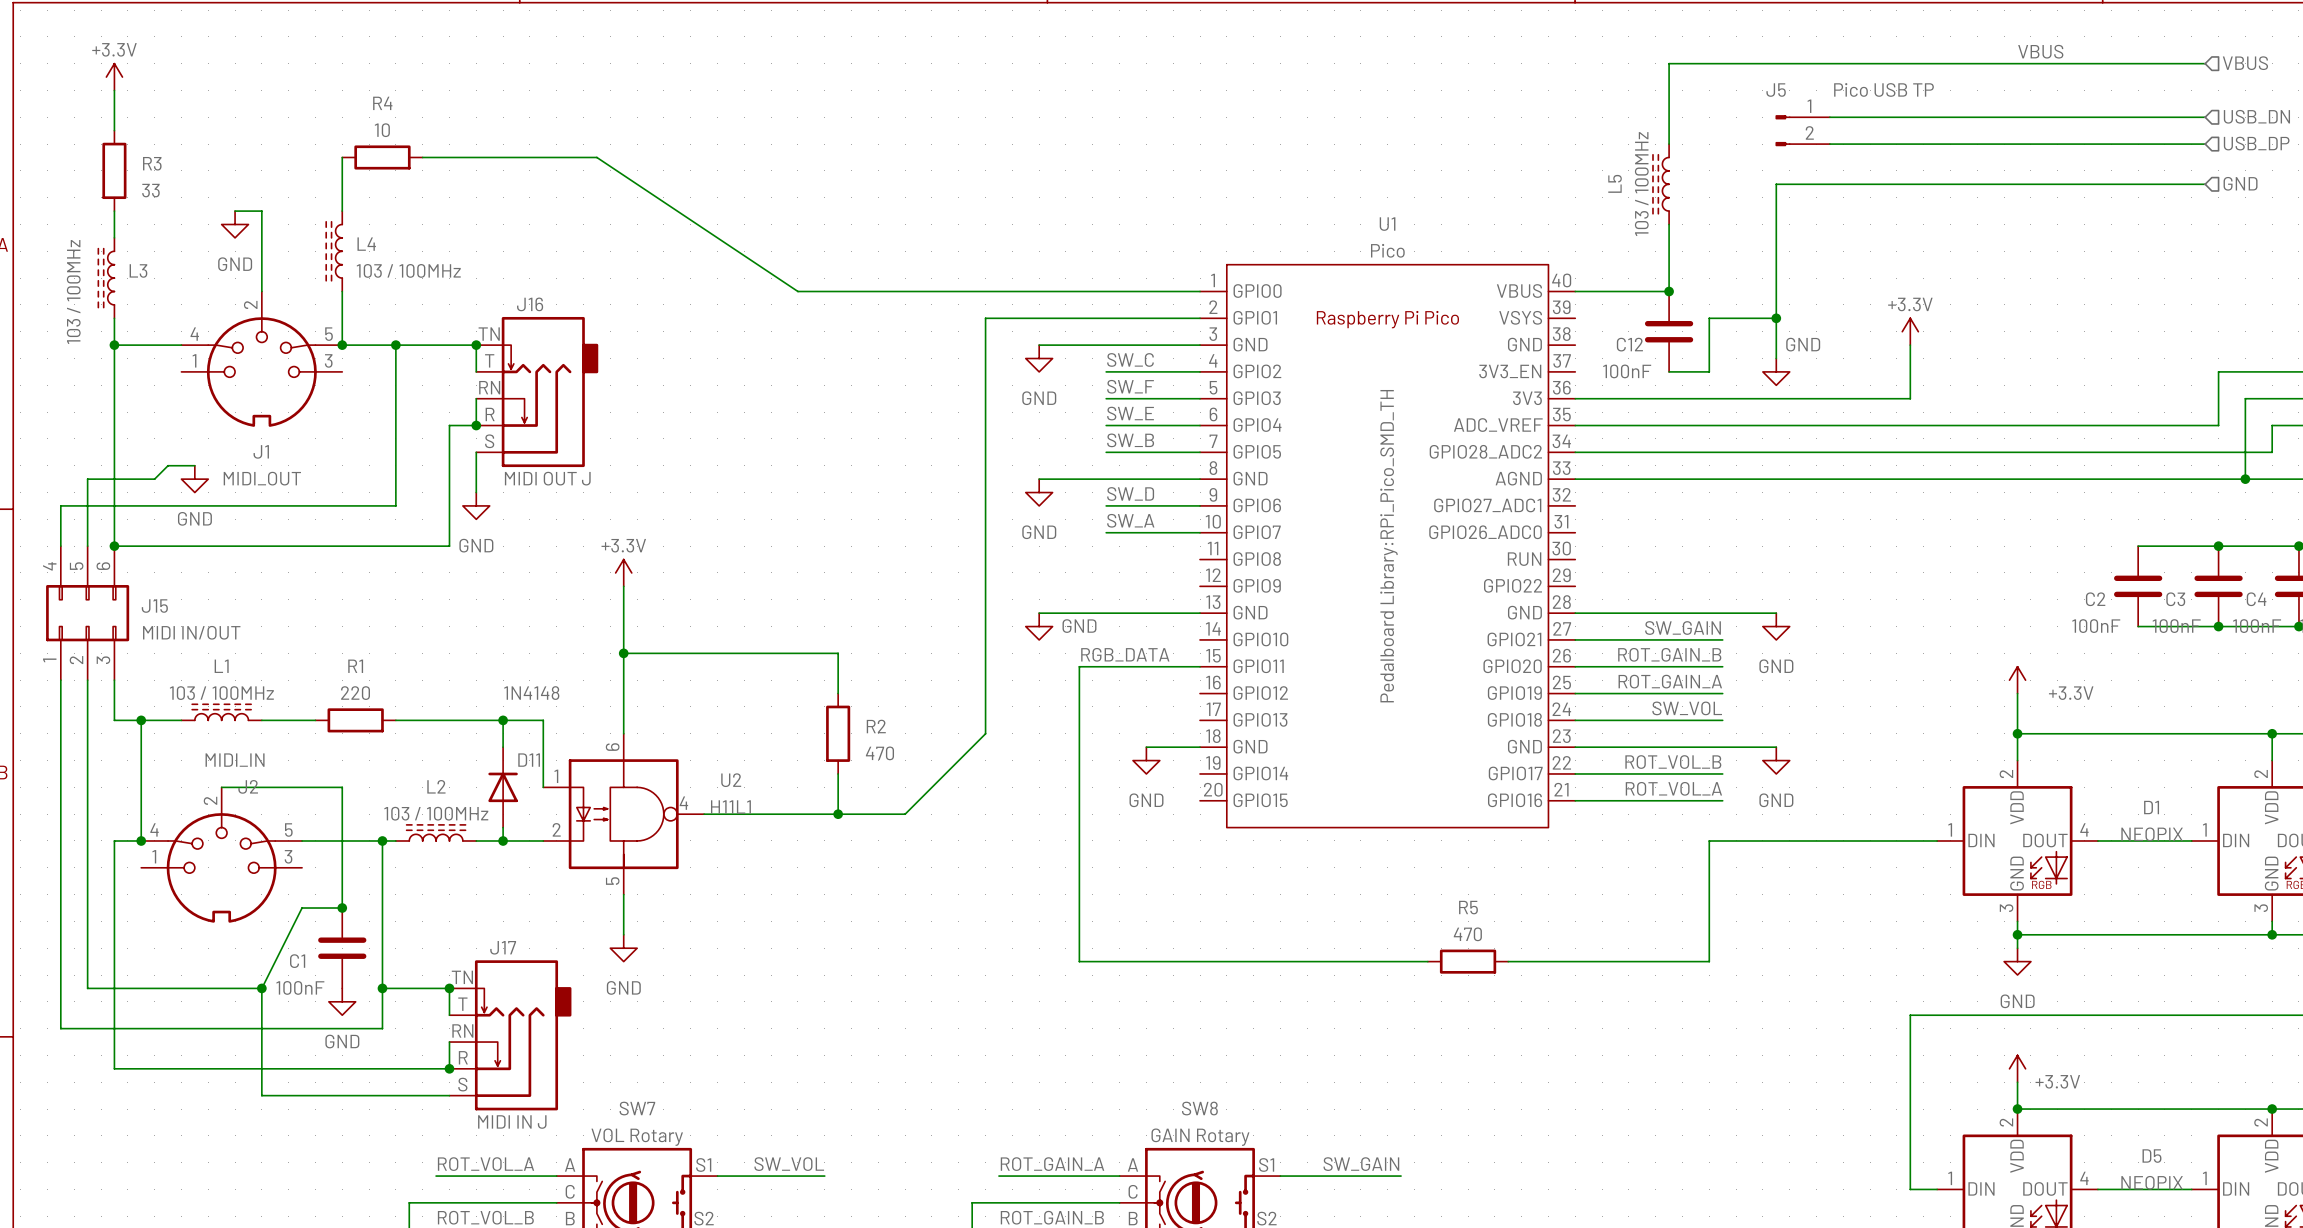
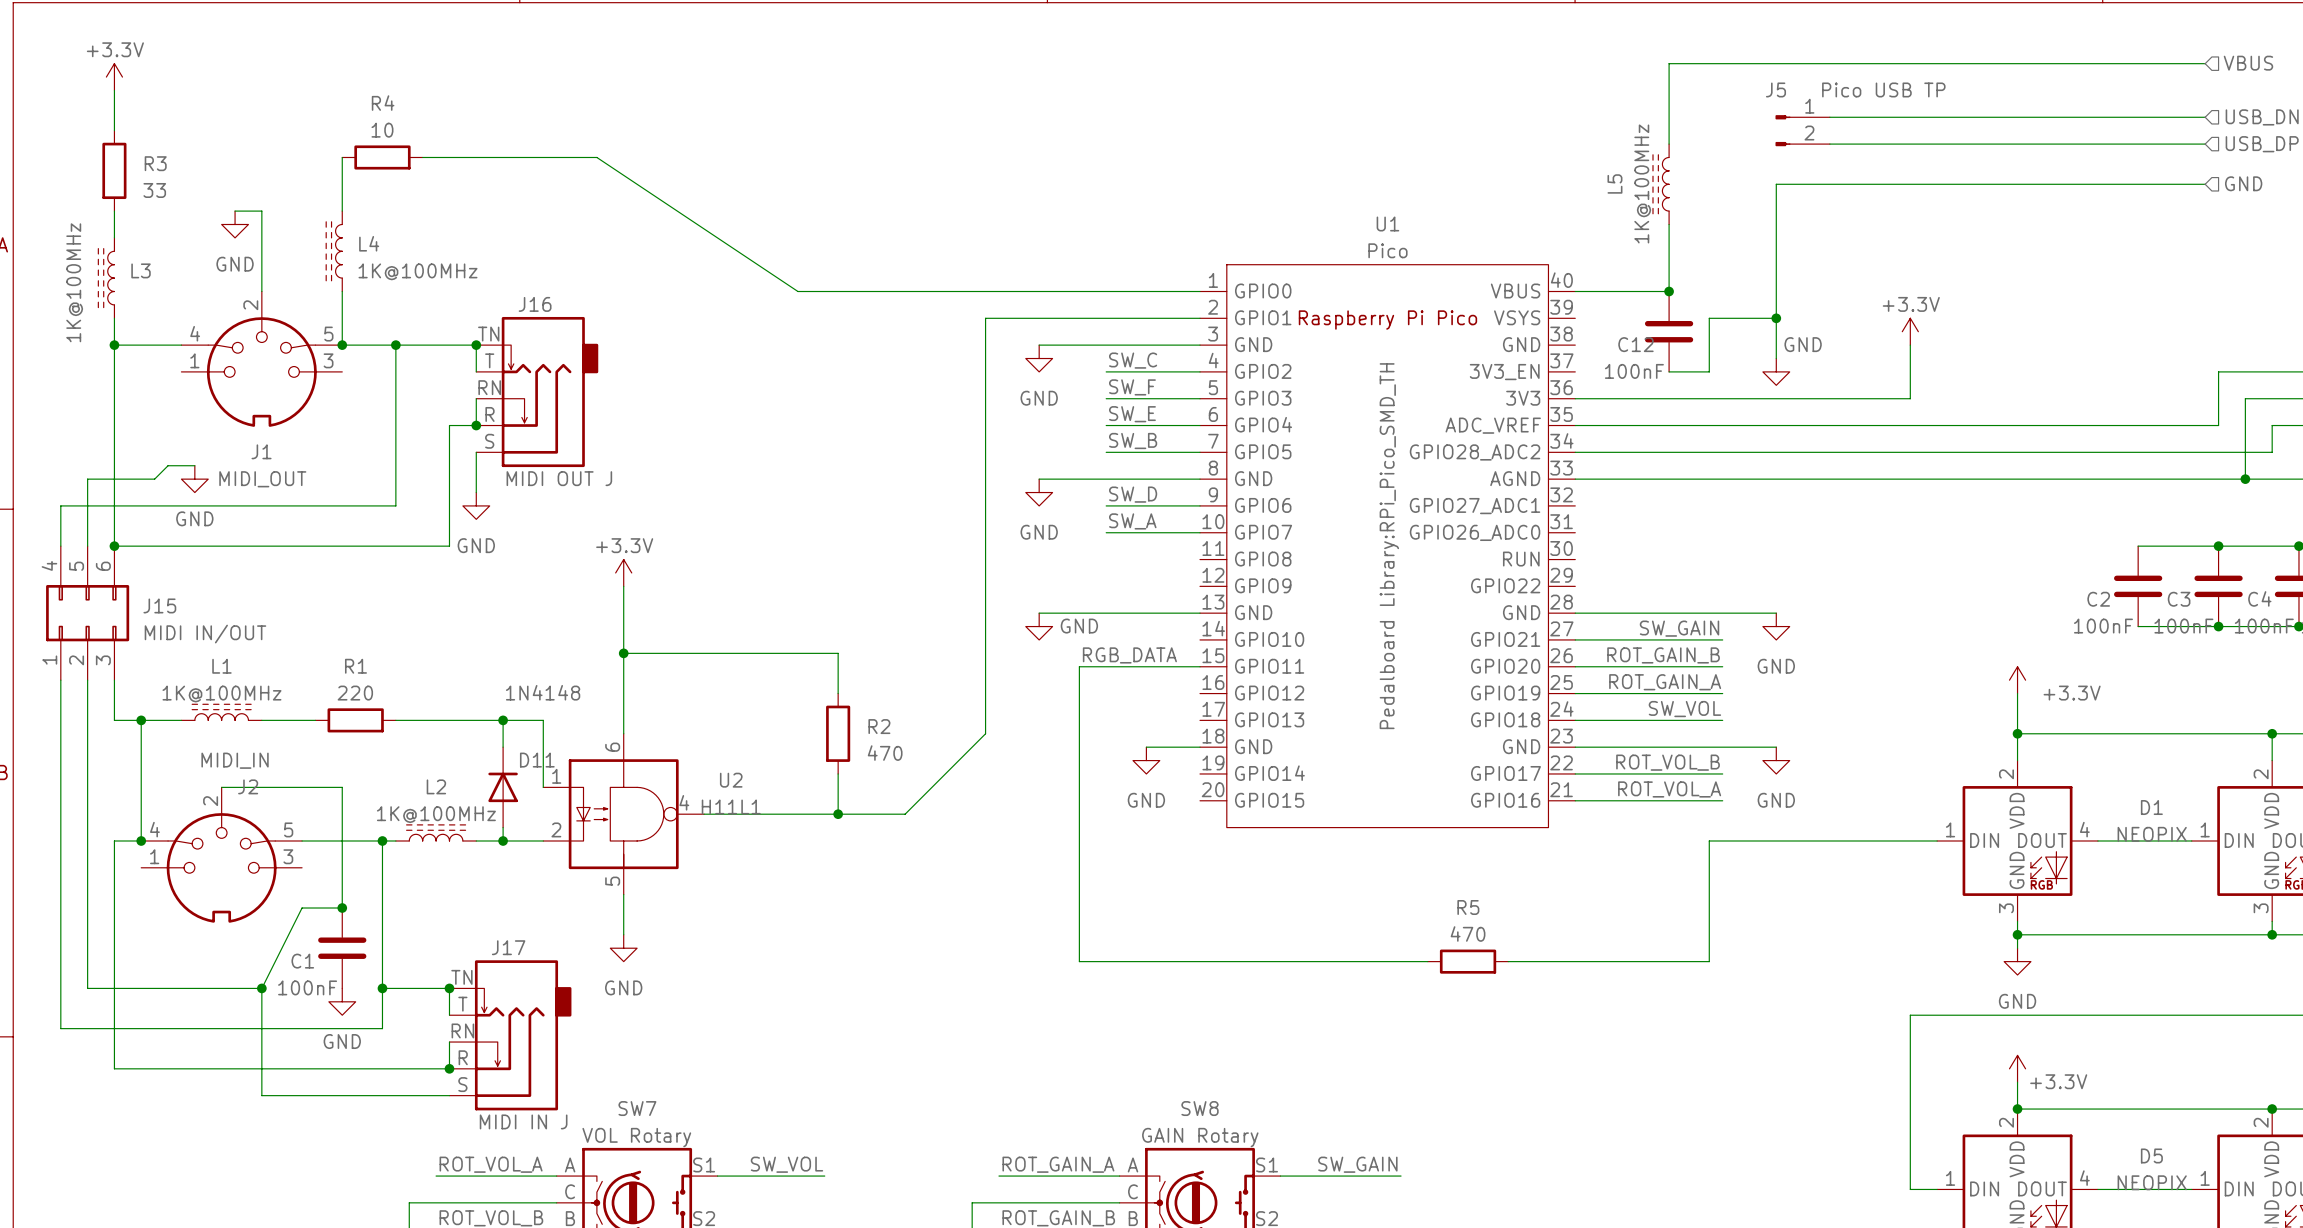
label: VBUS (2040, 51) -> none
L5 value: 103 / 100MHz (1641, 184) -> 1K@100MHz (1642, 183)
L4 value: 103 / 100MHz (408, 270) -> 1K@100MHz (417, 271)
L3 value: 103 / 100MHz (73, 292) -> 1K@100MHz (74, 282)
L1 value: 103 / 100MHz (221, 693) -> 1K@100MHz (221, 694)
L2 value: 103 / 100MHz (436, 813) -> 1K@100MHz (436, 814)

